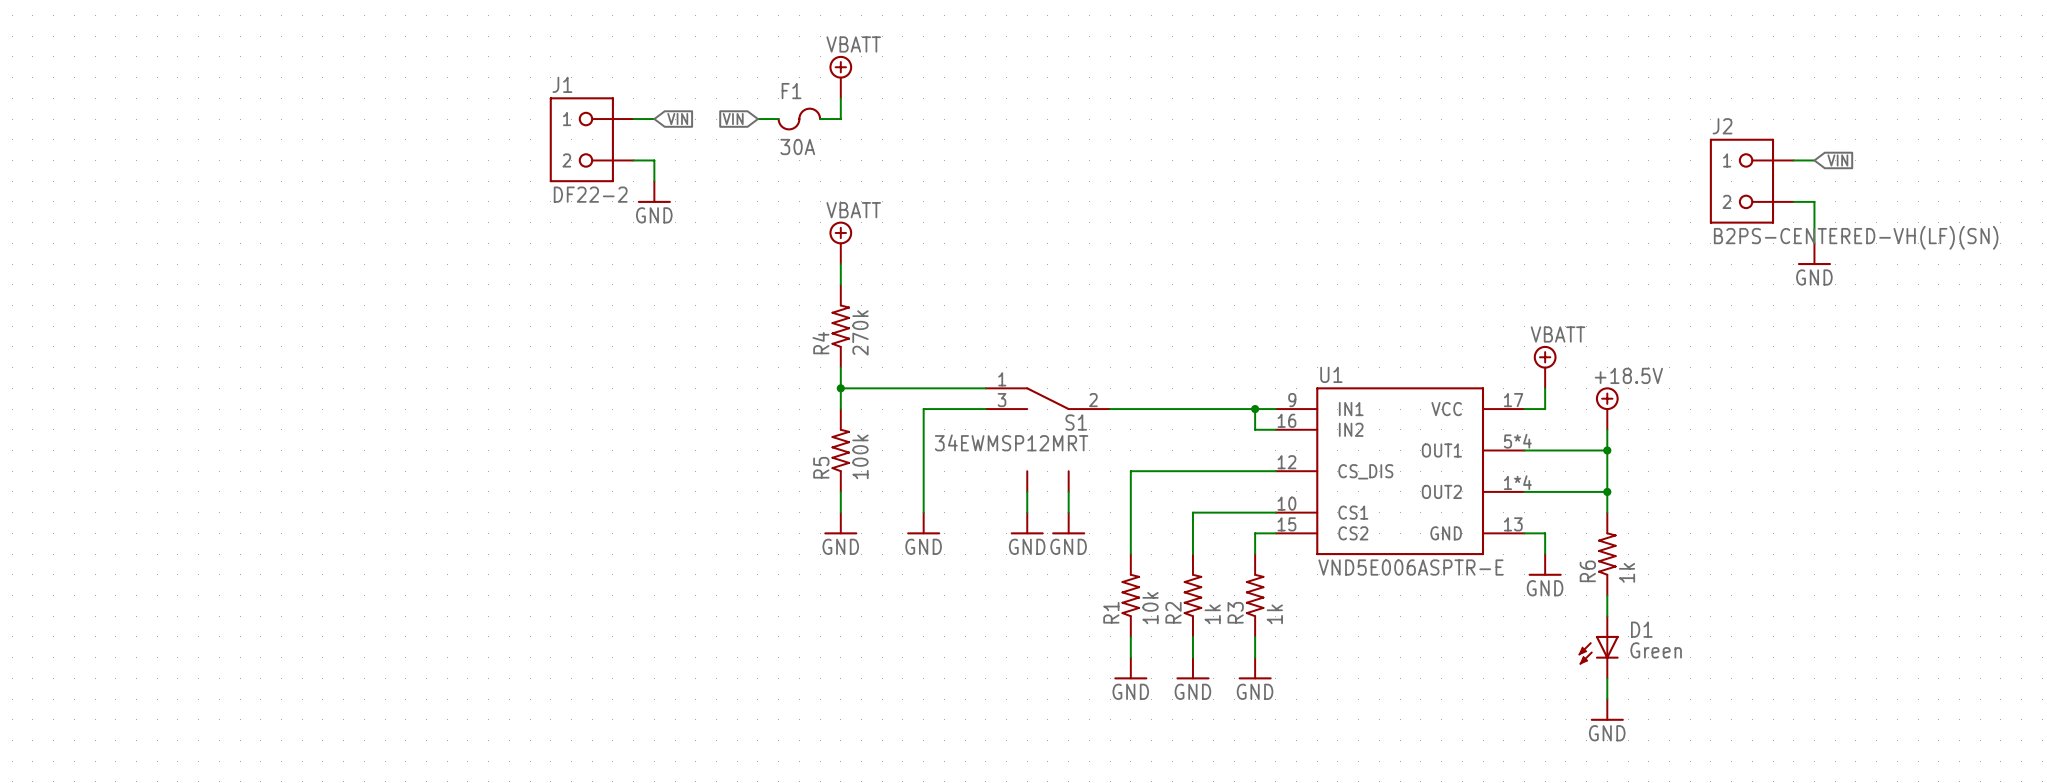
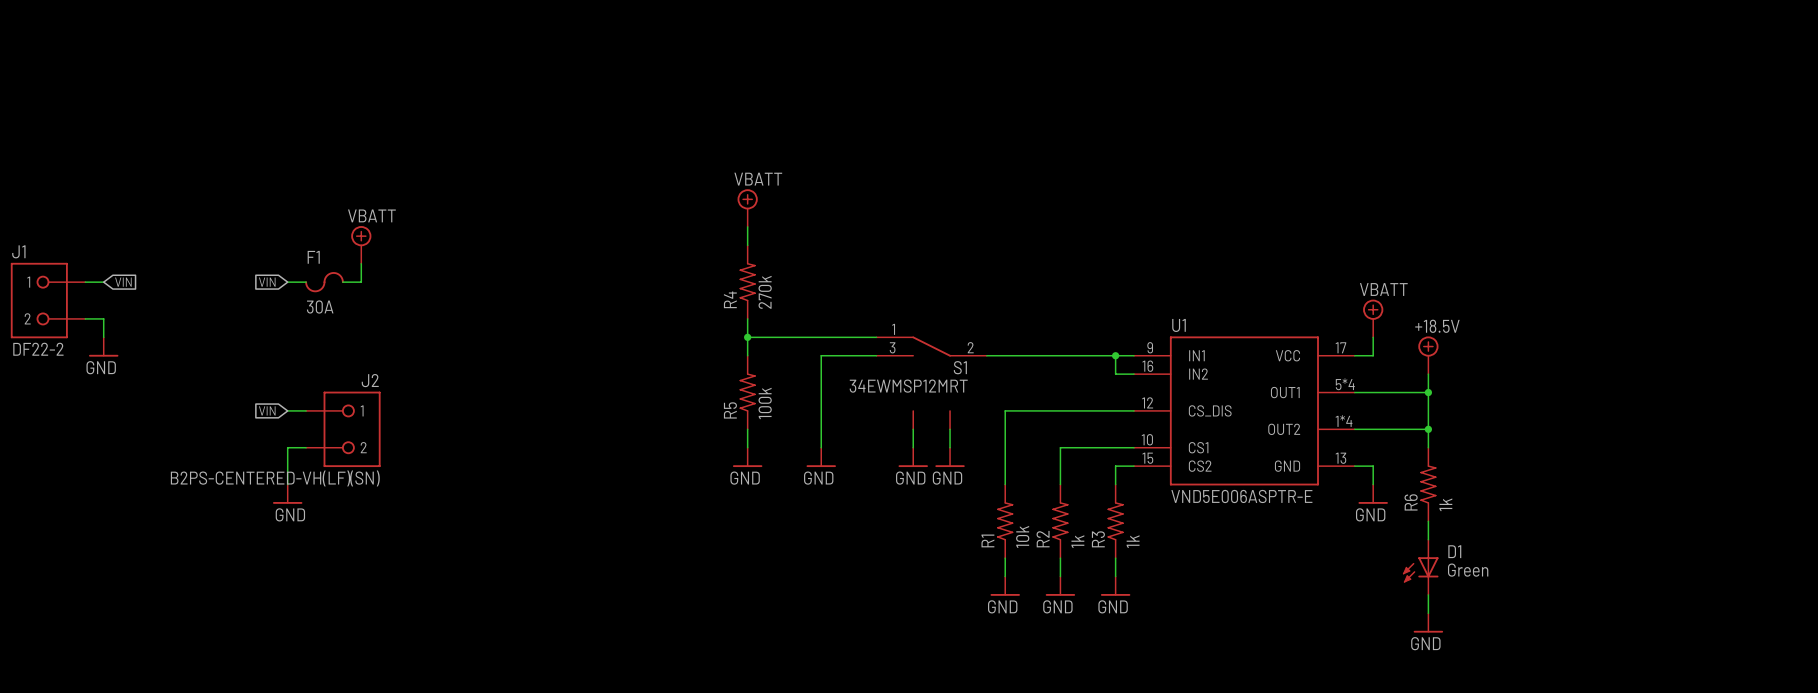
power symbol: VBATT (840, 77) -> none
wire: (840, 98) (840, 119) (820, 119) -> none
wire: (633, 119) (654, 119) -> none
global label: VIN (677, 119) -> none
global label: VIN (733, 119) -> none
wire: (757, 119) (778, 119) -> none
F1 position: (799, 119) -> (324, 282)
J1 position: (591, 139) -> (48, 300)
wire: (633, 160) (654, 160) (654, 181) -> none
wire: (1793, 160) (1814, 160) -> none
global label: VIN (1837, 160) -> none
J2 flip: as is (1741, 181) -> left-right (352, 429)
J2 position: (1751, 181) -> (343, 429)
power symbol: GND (654, 192) -> none
wire: (1793, 201) (1814, 201) (1814, 243) -> none
power symbol: GND (1814, 254) -> none
power symbol: none -> VBATT (361, 244)
wire: none -> (361, 263) (361, 282) (342, 282)
wire: none -> (85, 282) (103, 282)
global label: none -> VIN (123, 282)
global label: none -> VIN (267, 282)
wire: none -> (287, 282) (306, 282)
wire: none -> (85, 318) (103, 318) (103, 337)
power symbol: none -> GND (103, 347)
global label: none -> VIN (267, 410)
wire: none -> (287, 410) (306, 410)
wire: none -> (306, 447) (287, 447) (287, 484)
power symbol: none -> GND (287, 494)

